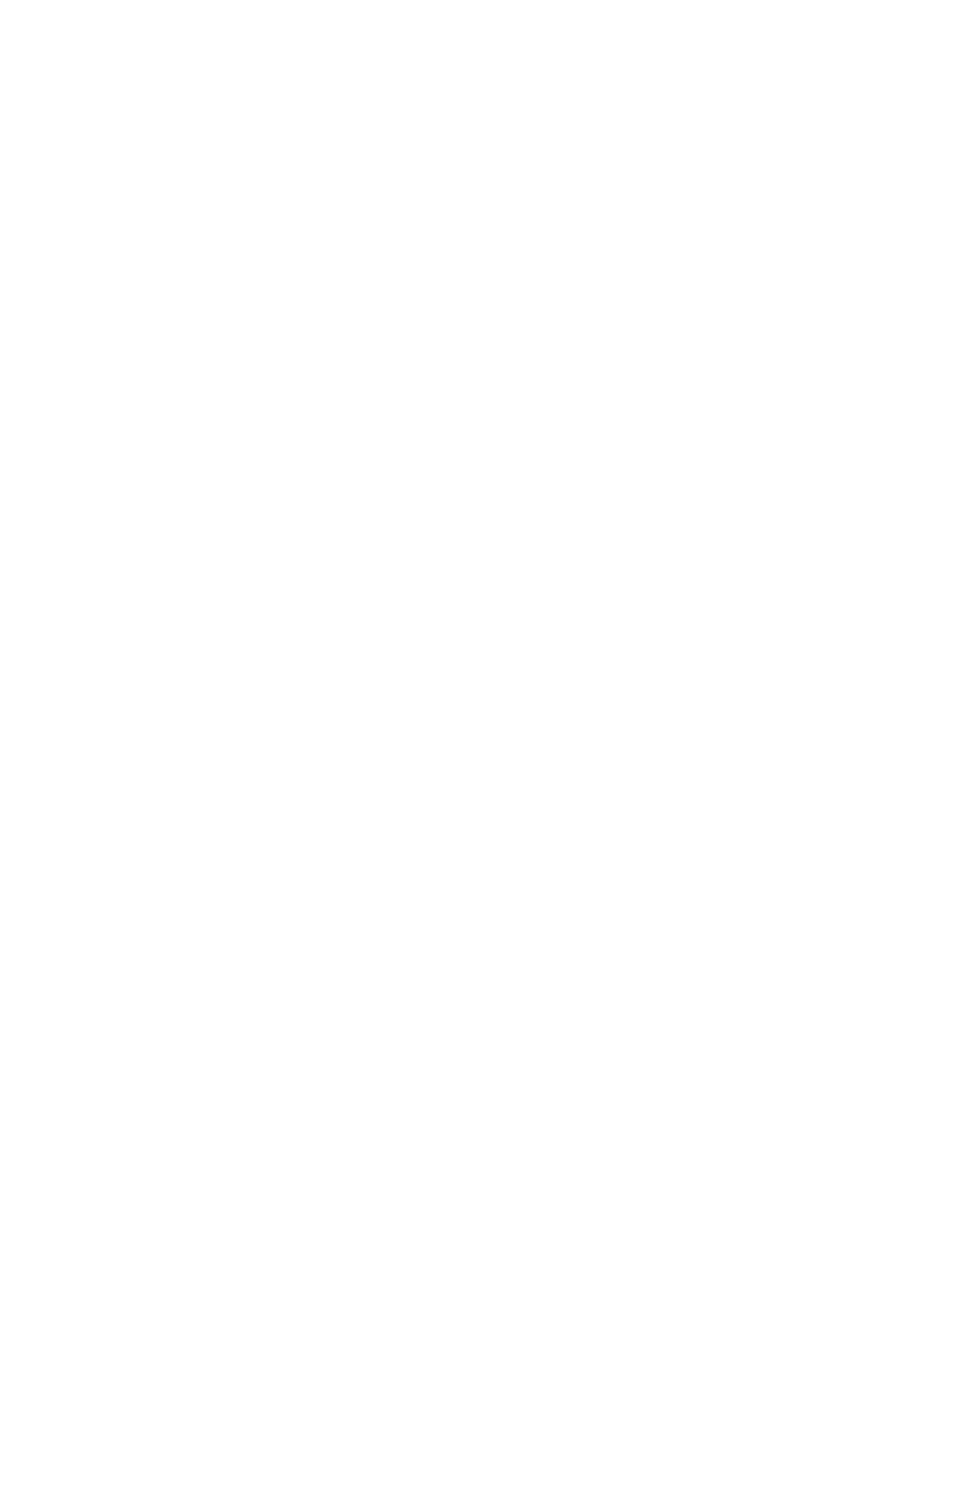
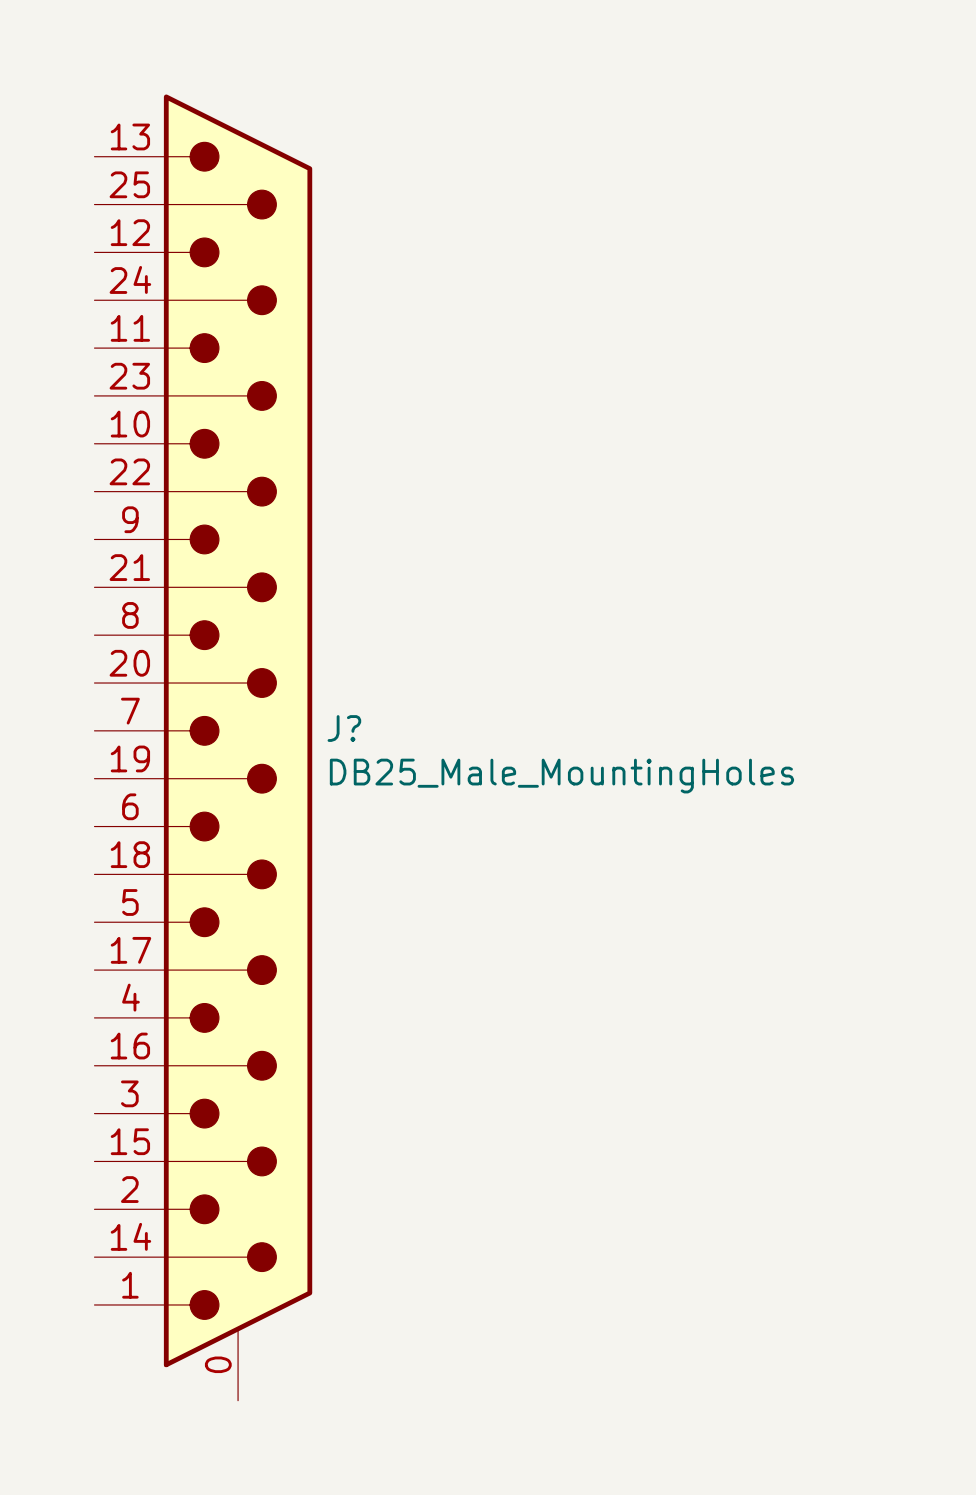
J?: none -> DB25_Male_MountingHoles (203, 747)

